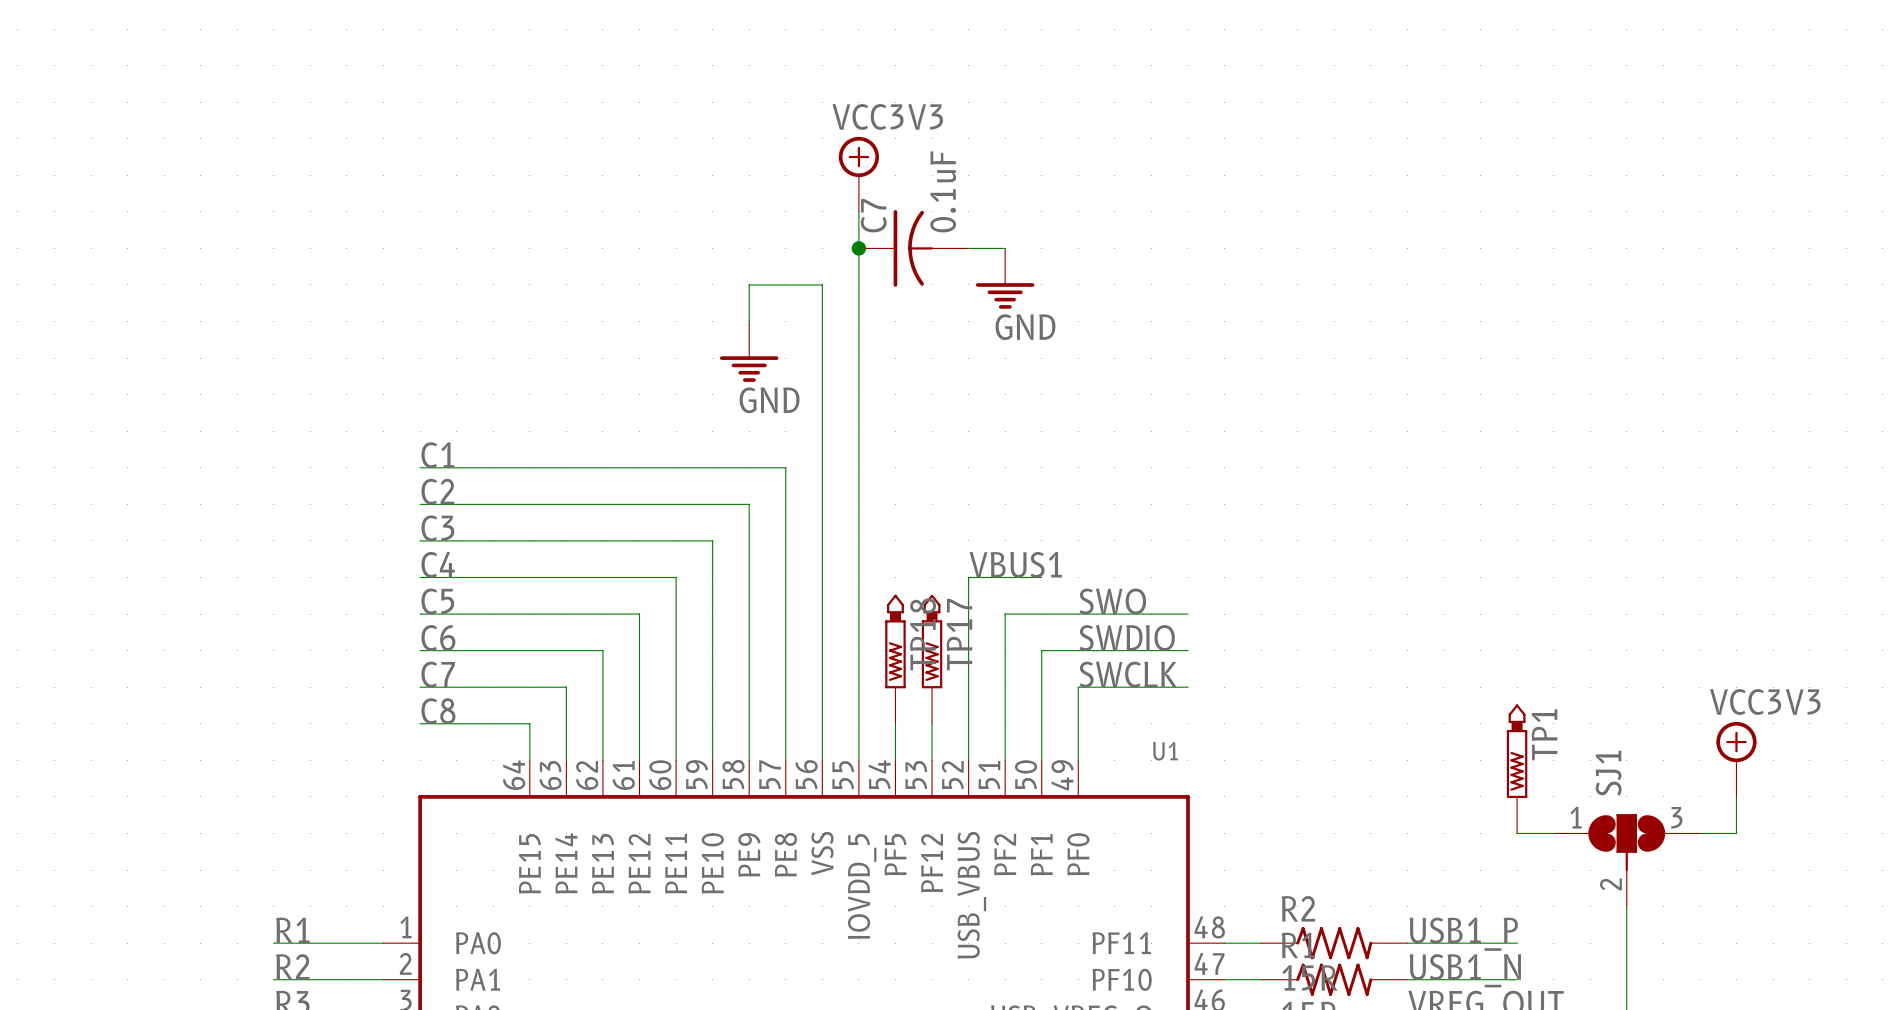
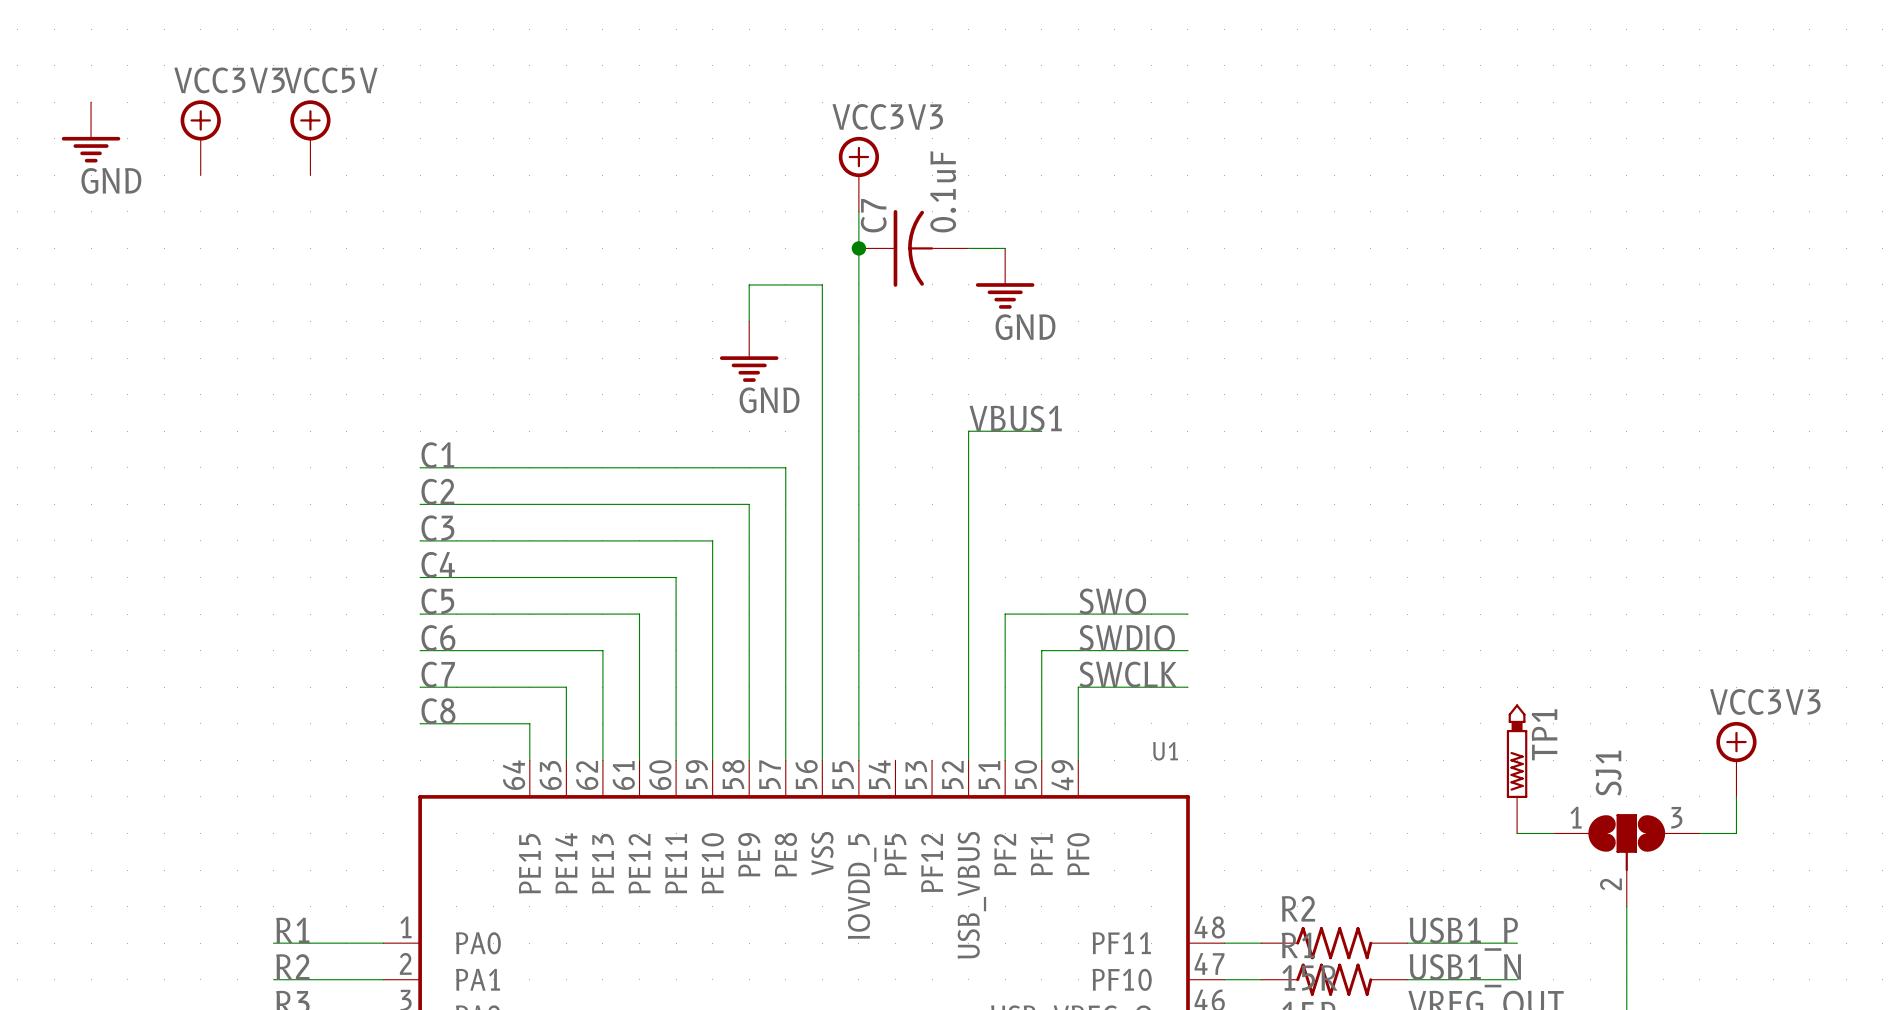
power symbol: none -> GND (91, 132)
power symbol: none -> VCC3V3 (200, 137)
power symbol: none -> VCC5V (310, 137)
label position: VBUS1 (1015, 564) -> VBUS1 (1015, 418)
wire: (968, 577) (1041, 577) -> (968, 577) (968, 431) (1041, 431)
TP18: (895, 659) -> none
TP17: (932, 659) -> none
wire: (895, 723) (895, 760) -> none
wire: (932, 723) (932, 760) -> none

